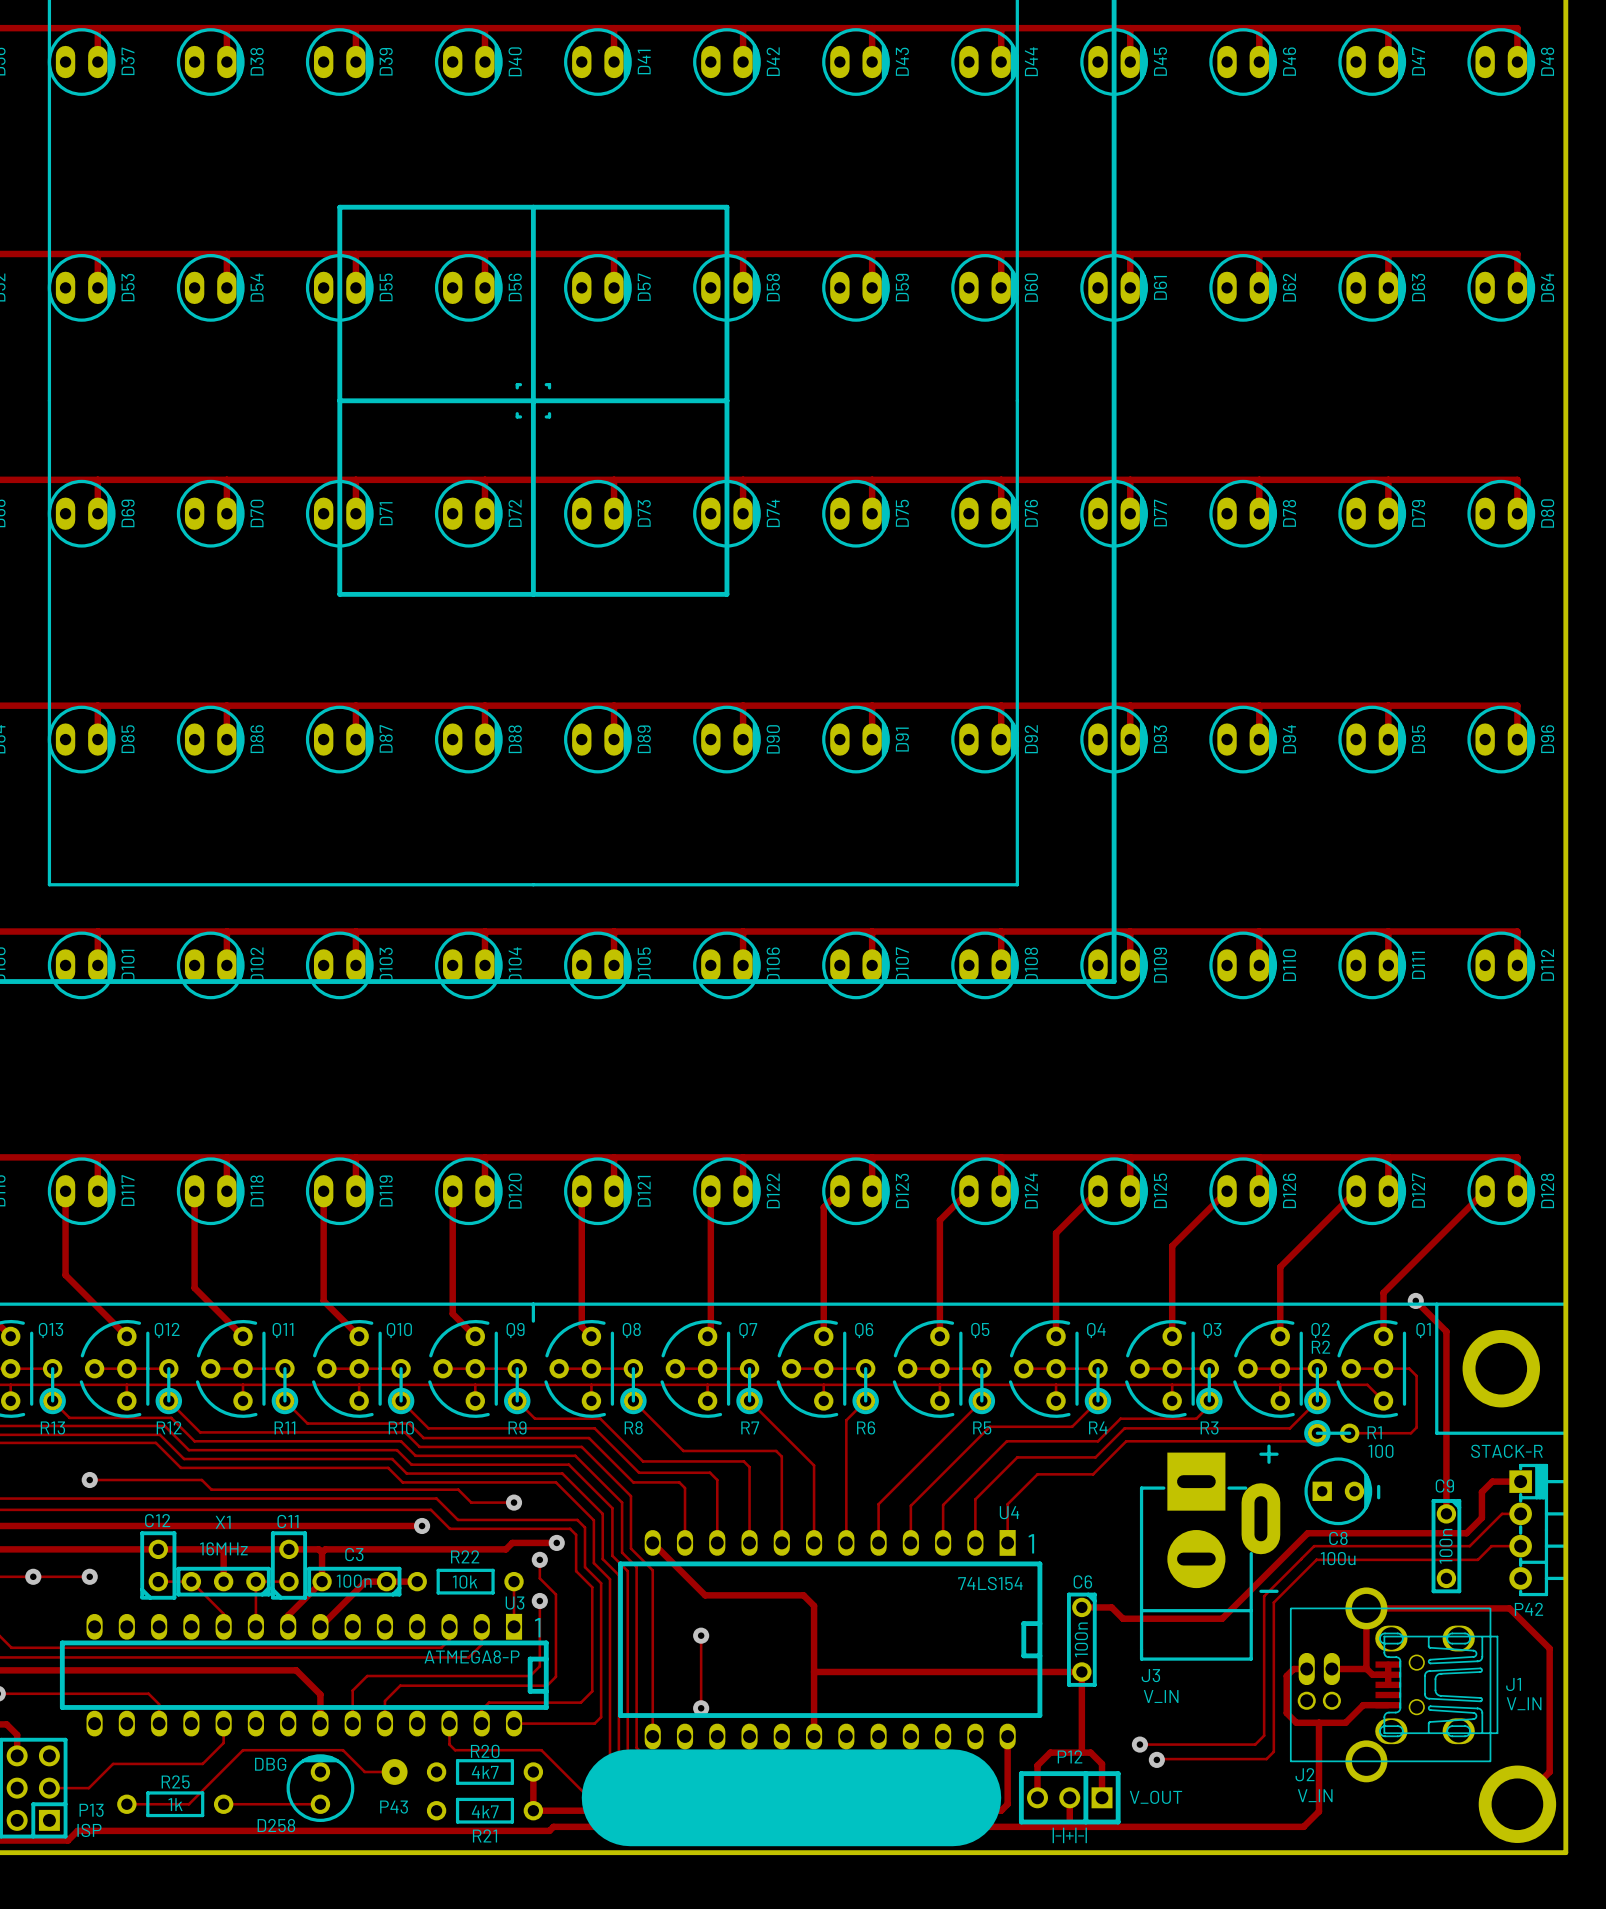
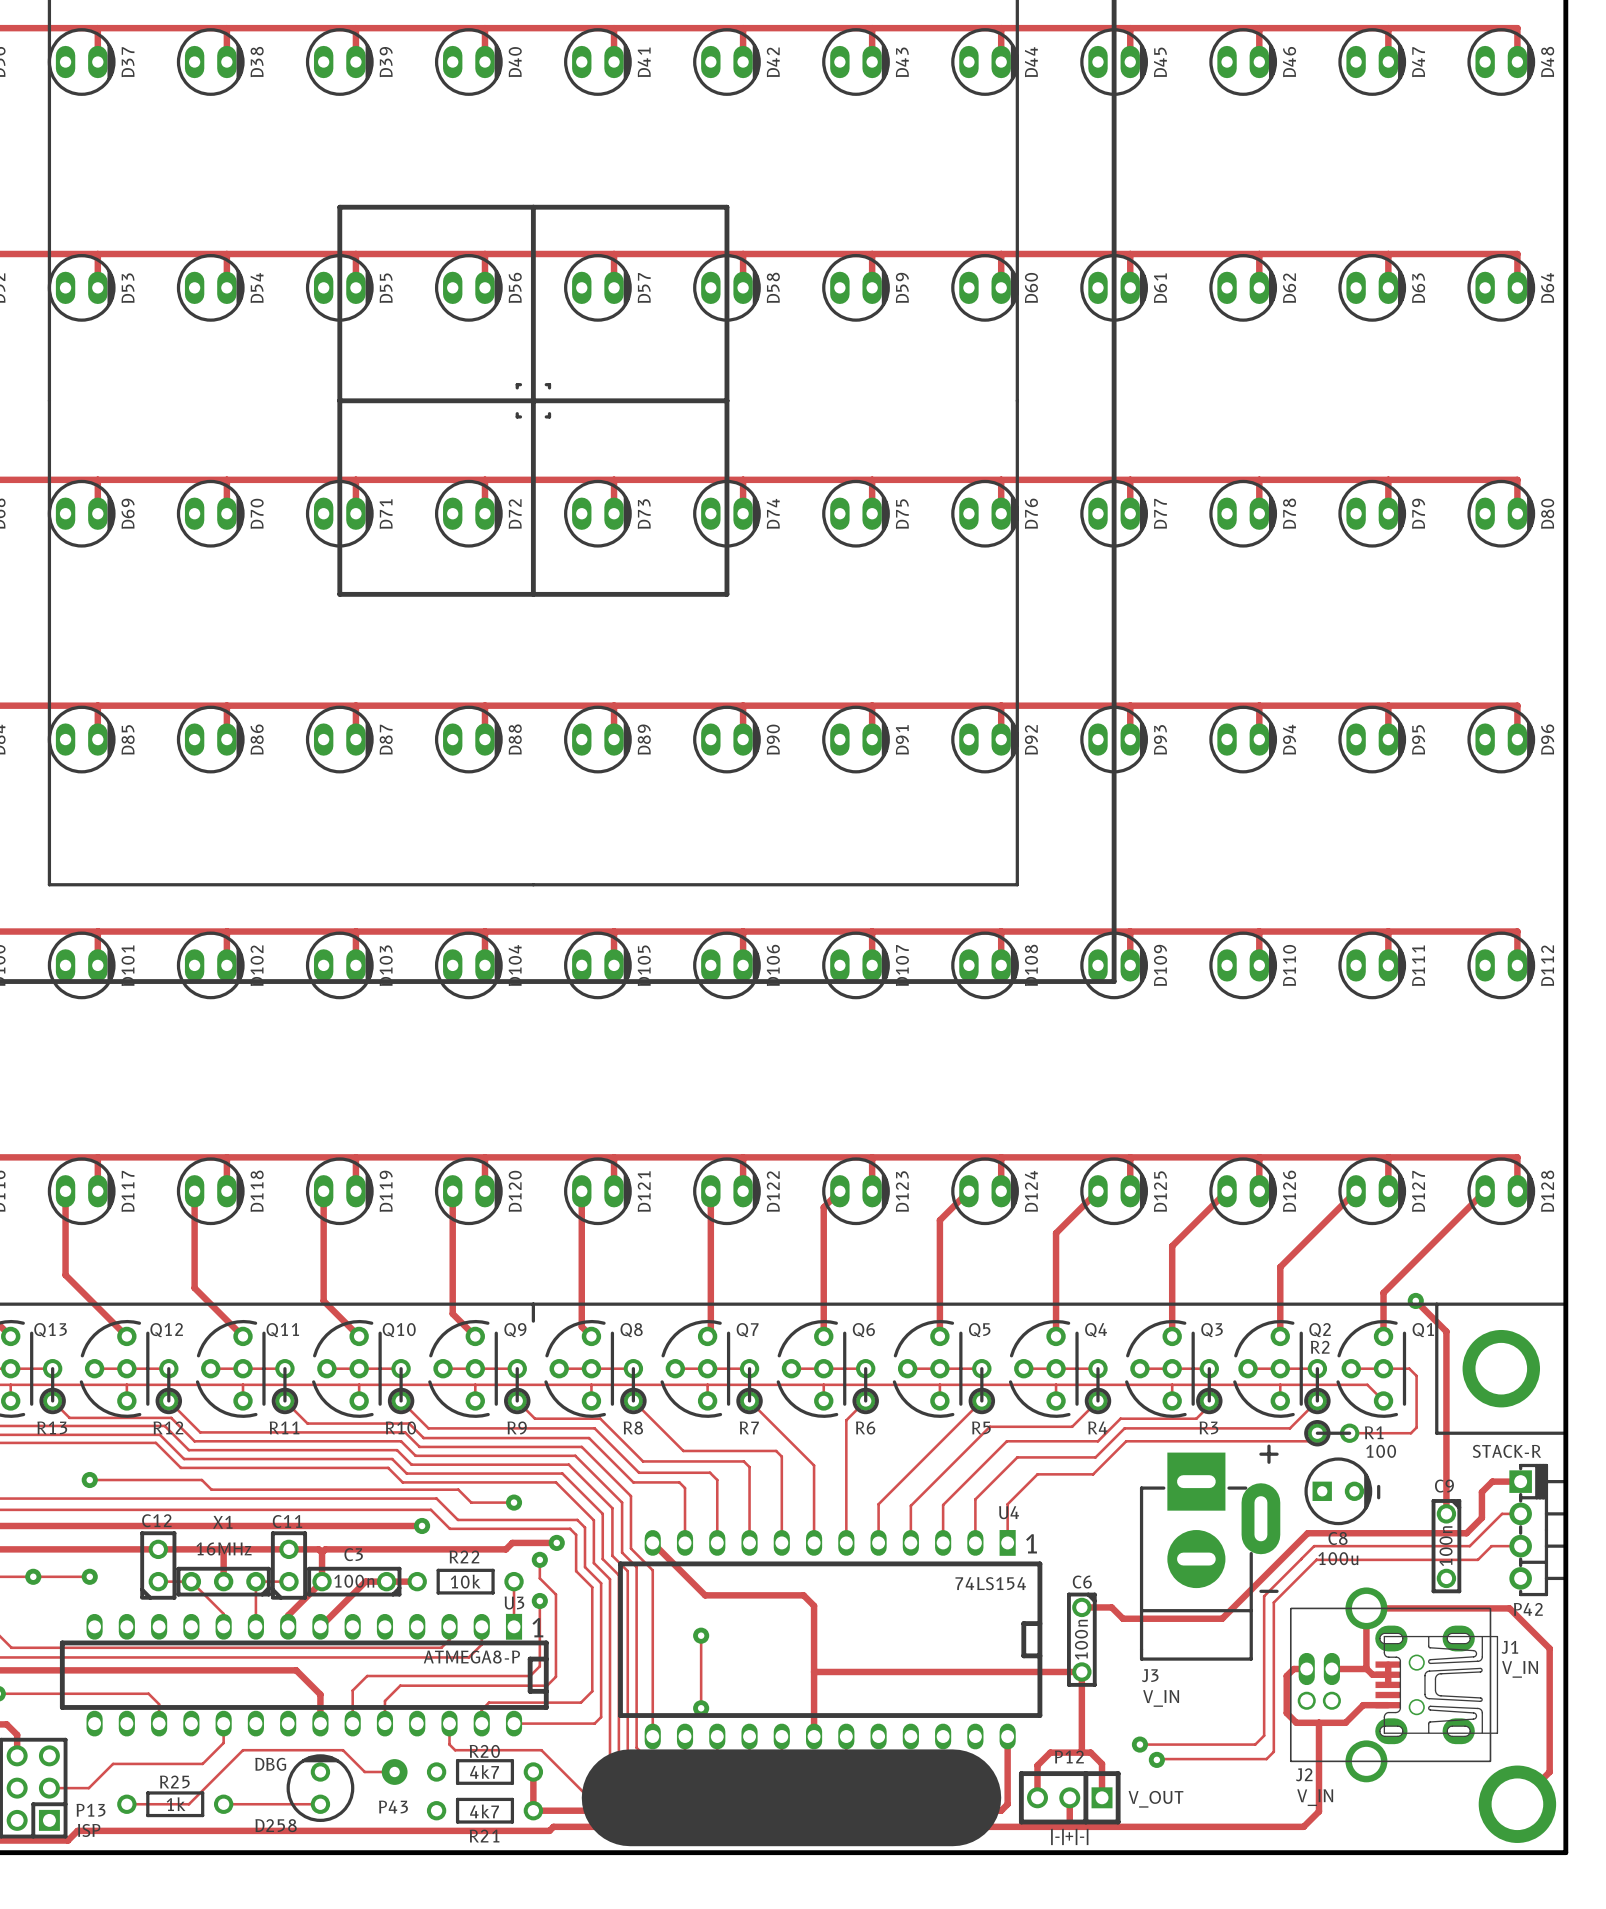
J1 footprint: [1375, 1625, 1499, 1745] -> [1375, 1625, 1499, 1745]
J1 name position: J1 (1513, 1684) -> J1 (1509, 1647)
J1 value position: V_IN (1524, 1703) -> V_IN (1520, 1669)

